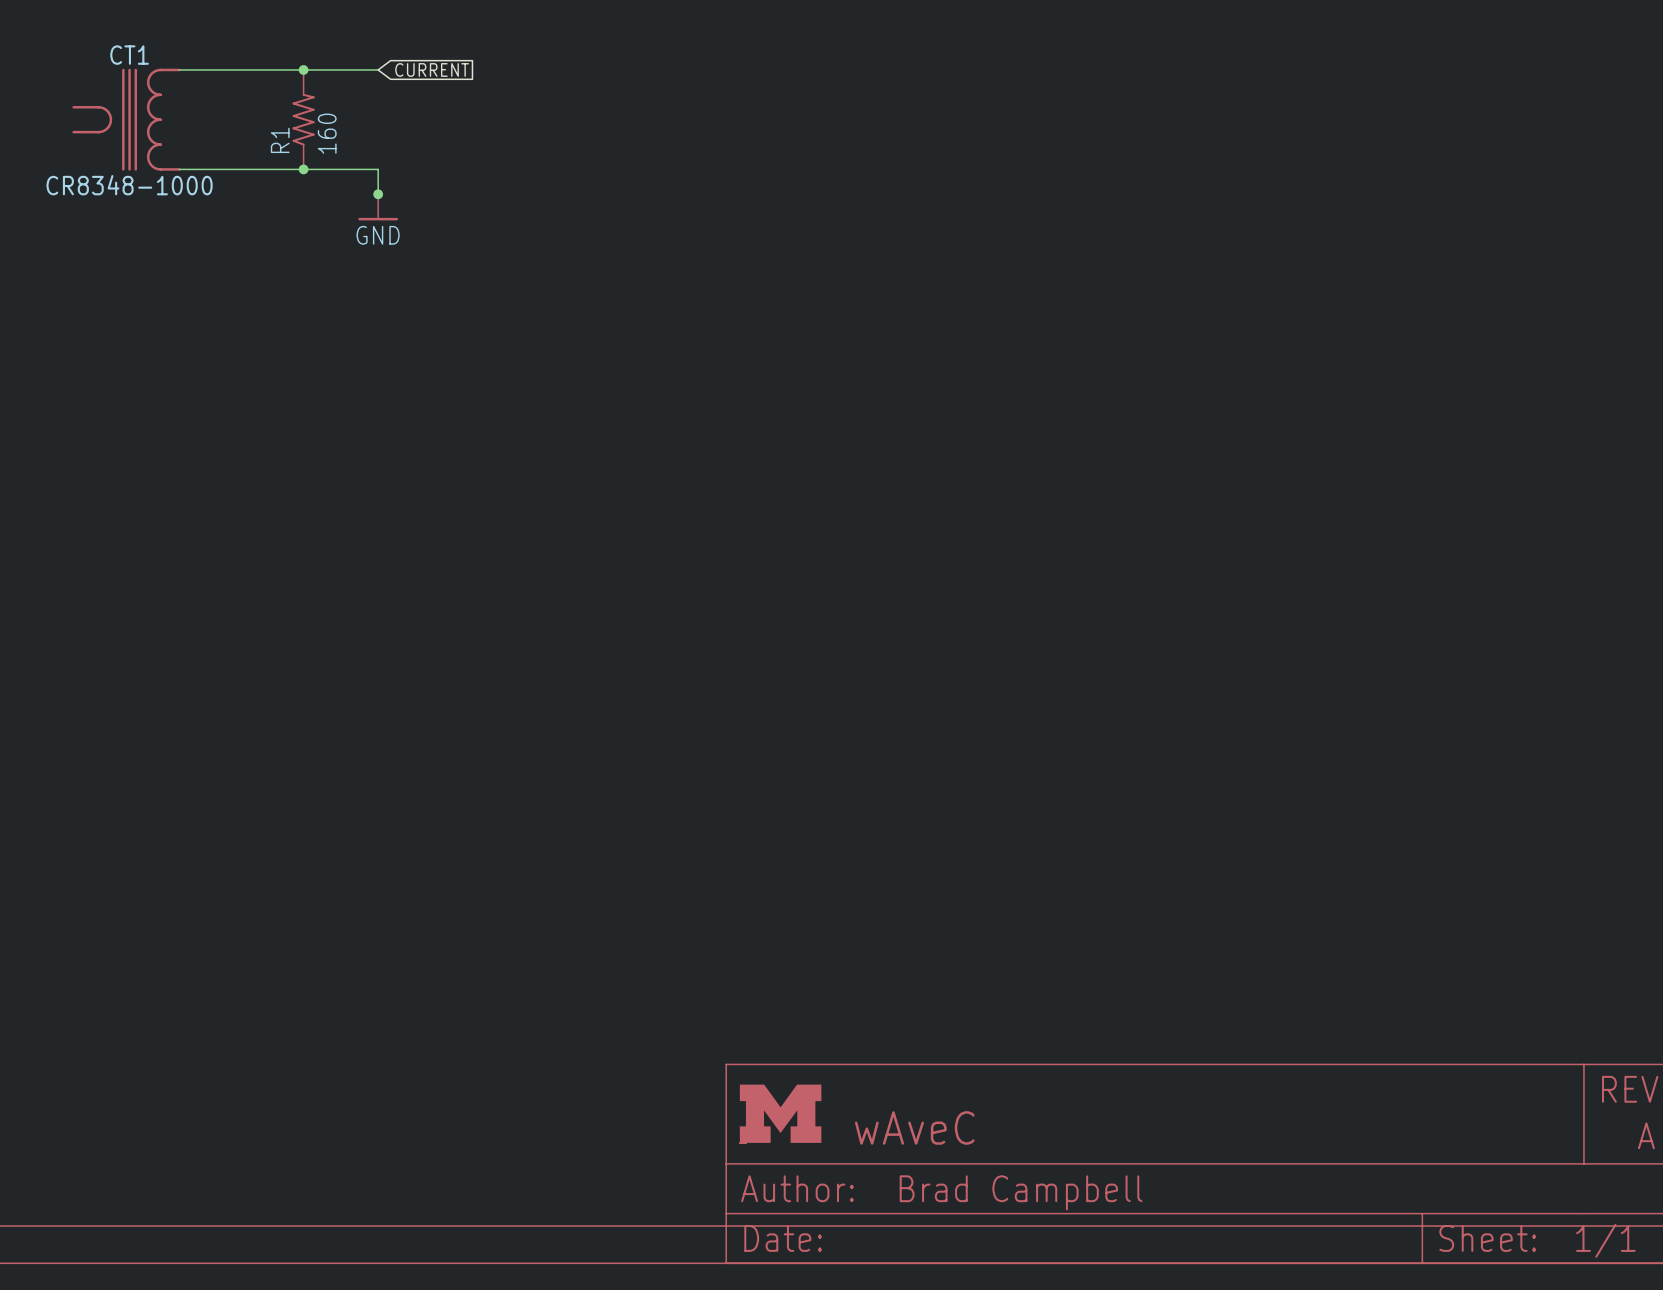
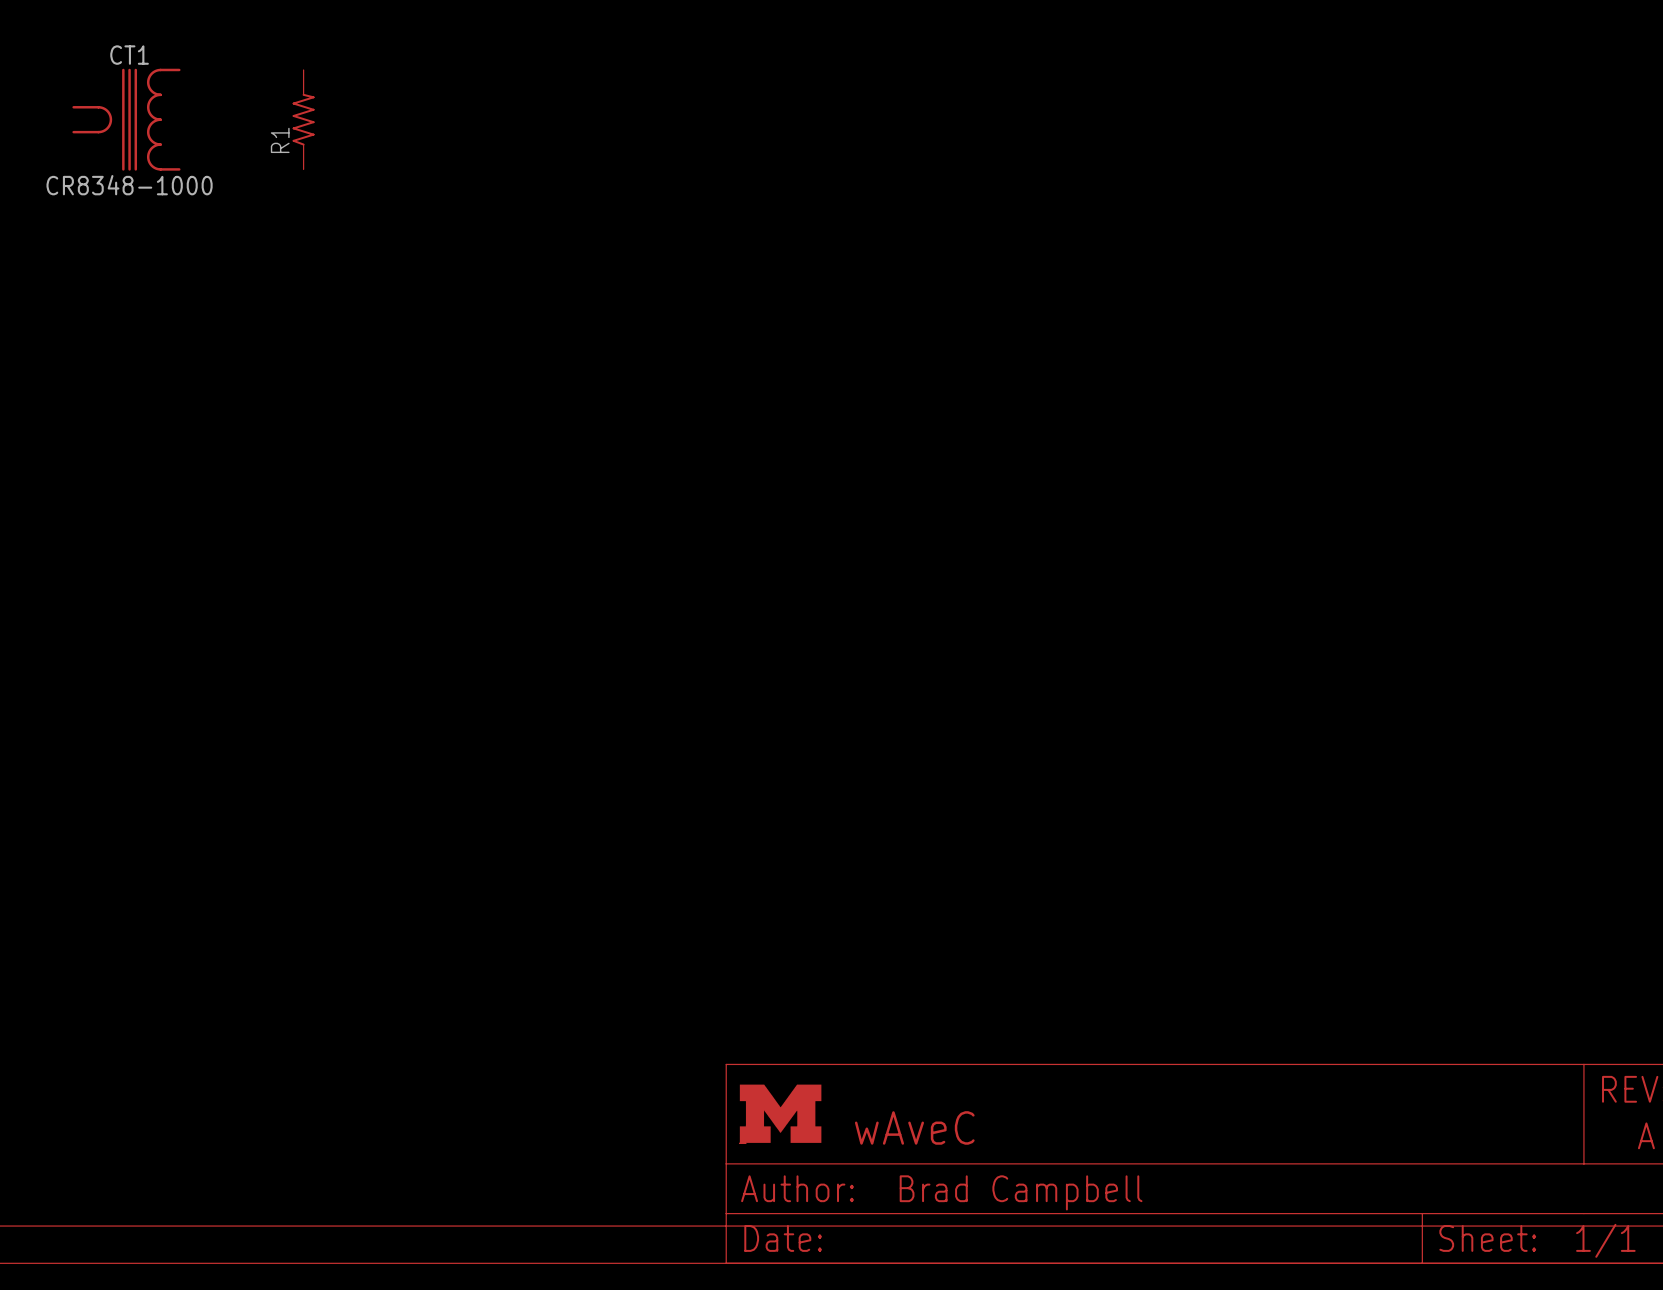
wire: (179, 69) (378, 69) -> none
junction: (303, 69) -> none
global label: CURRENT (432, 69) -> none
R1 value: 160 (327, 133) -> none
wire: (179, 169) (378, 169) (378, 194) -> none
junction: (303, 169) -> none
junction: (378, 194) -> none
power symbol: GND (378, 207) -> none

